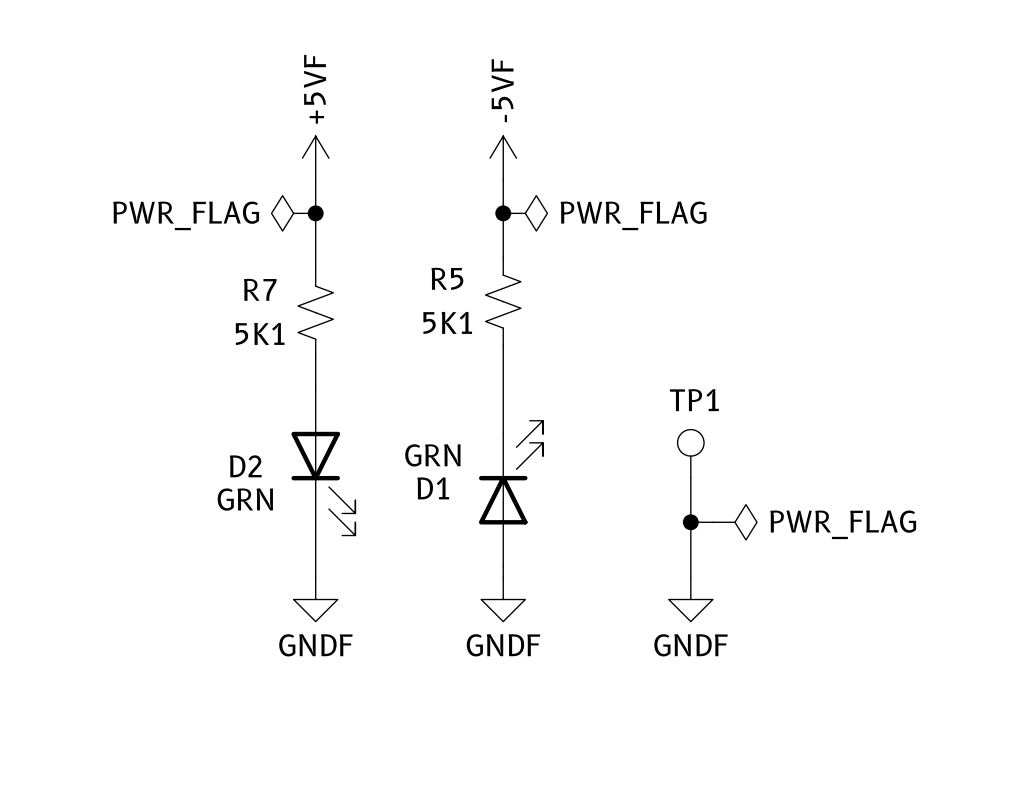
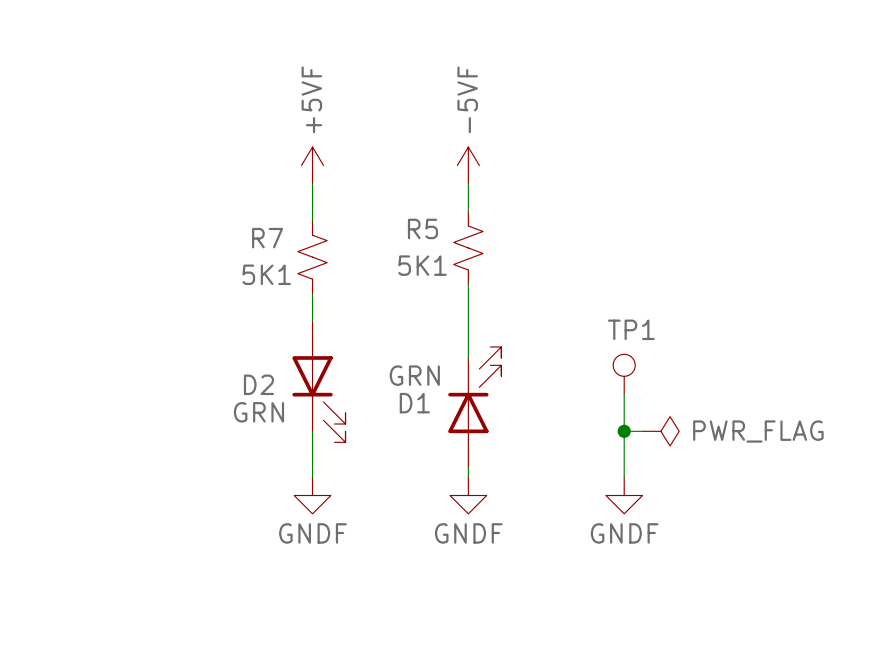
power symbol position: +5VF (315, 158) -> +5VF (312, 165)
power symbol position: -5VF (503, 158) -> -5VF (468, 165)
power symbol: PWR_FLAG (293, 213) -> none
junction: (315, 213) -> none
junction: (503, 213) -> none
power symbol: PWR_FLAG (525, 213) -> none

